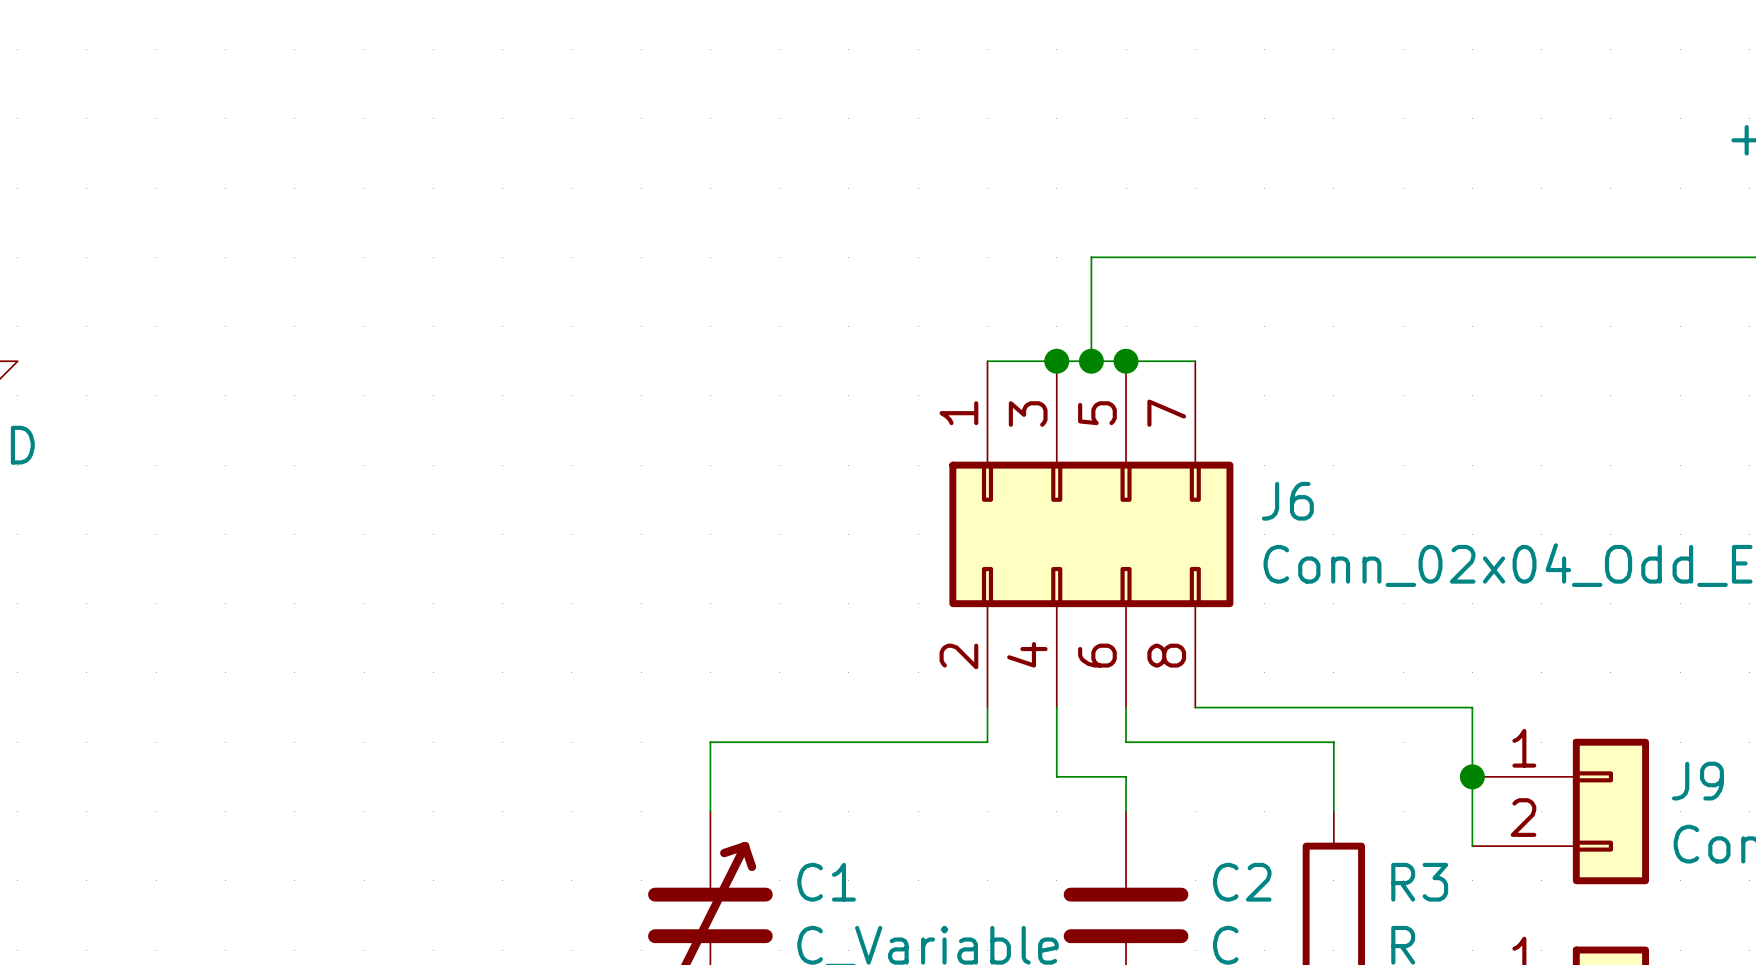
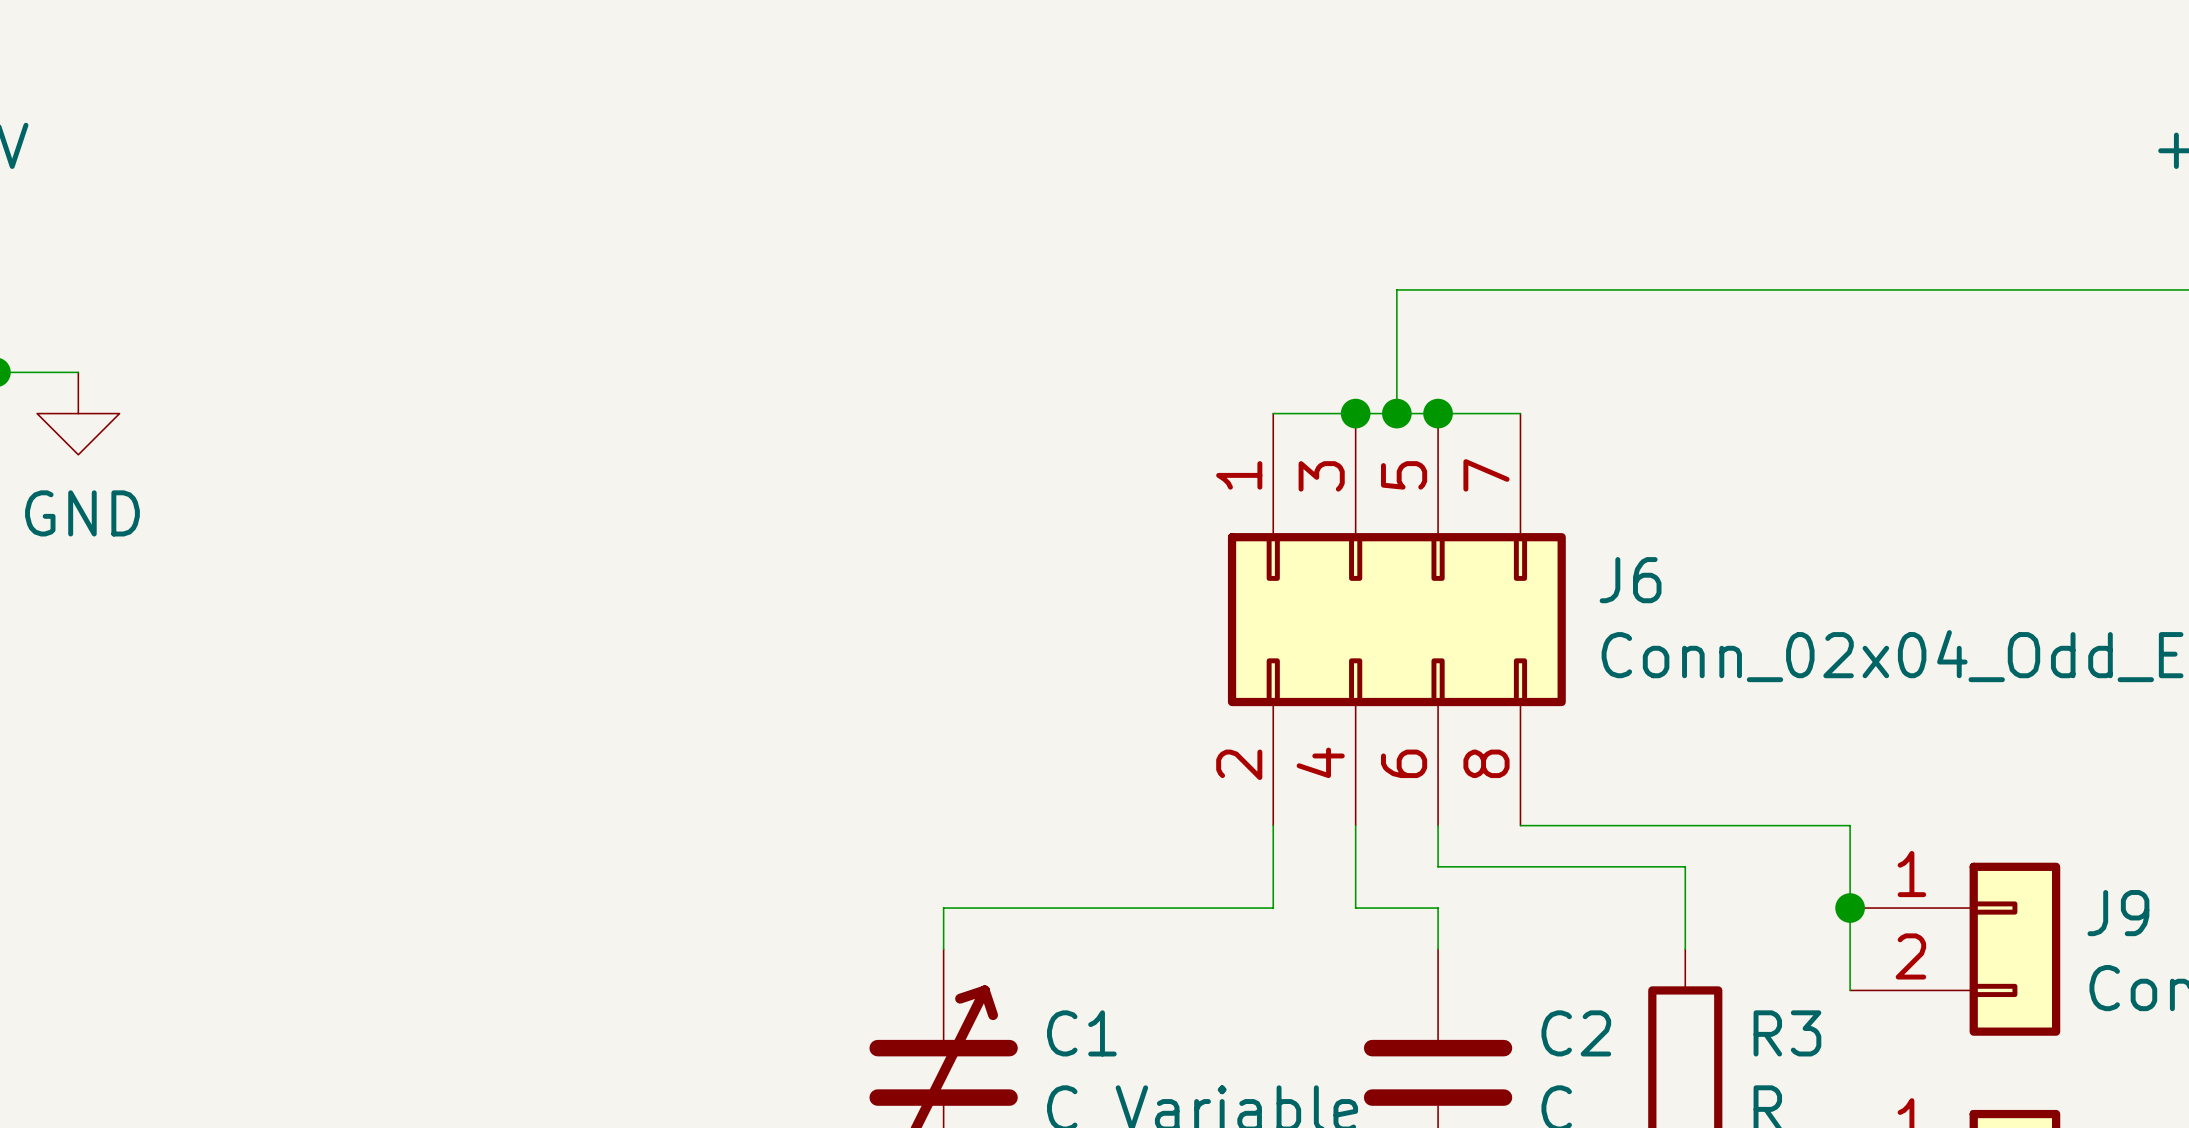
wire: (987, 742) (710, 742) (710, 776) -> (1273, 866) (1273, 908) (943, 908)

